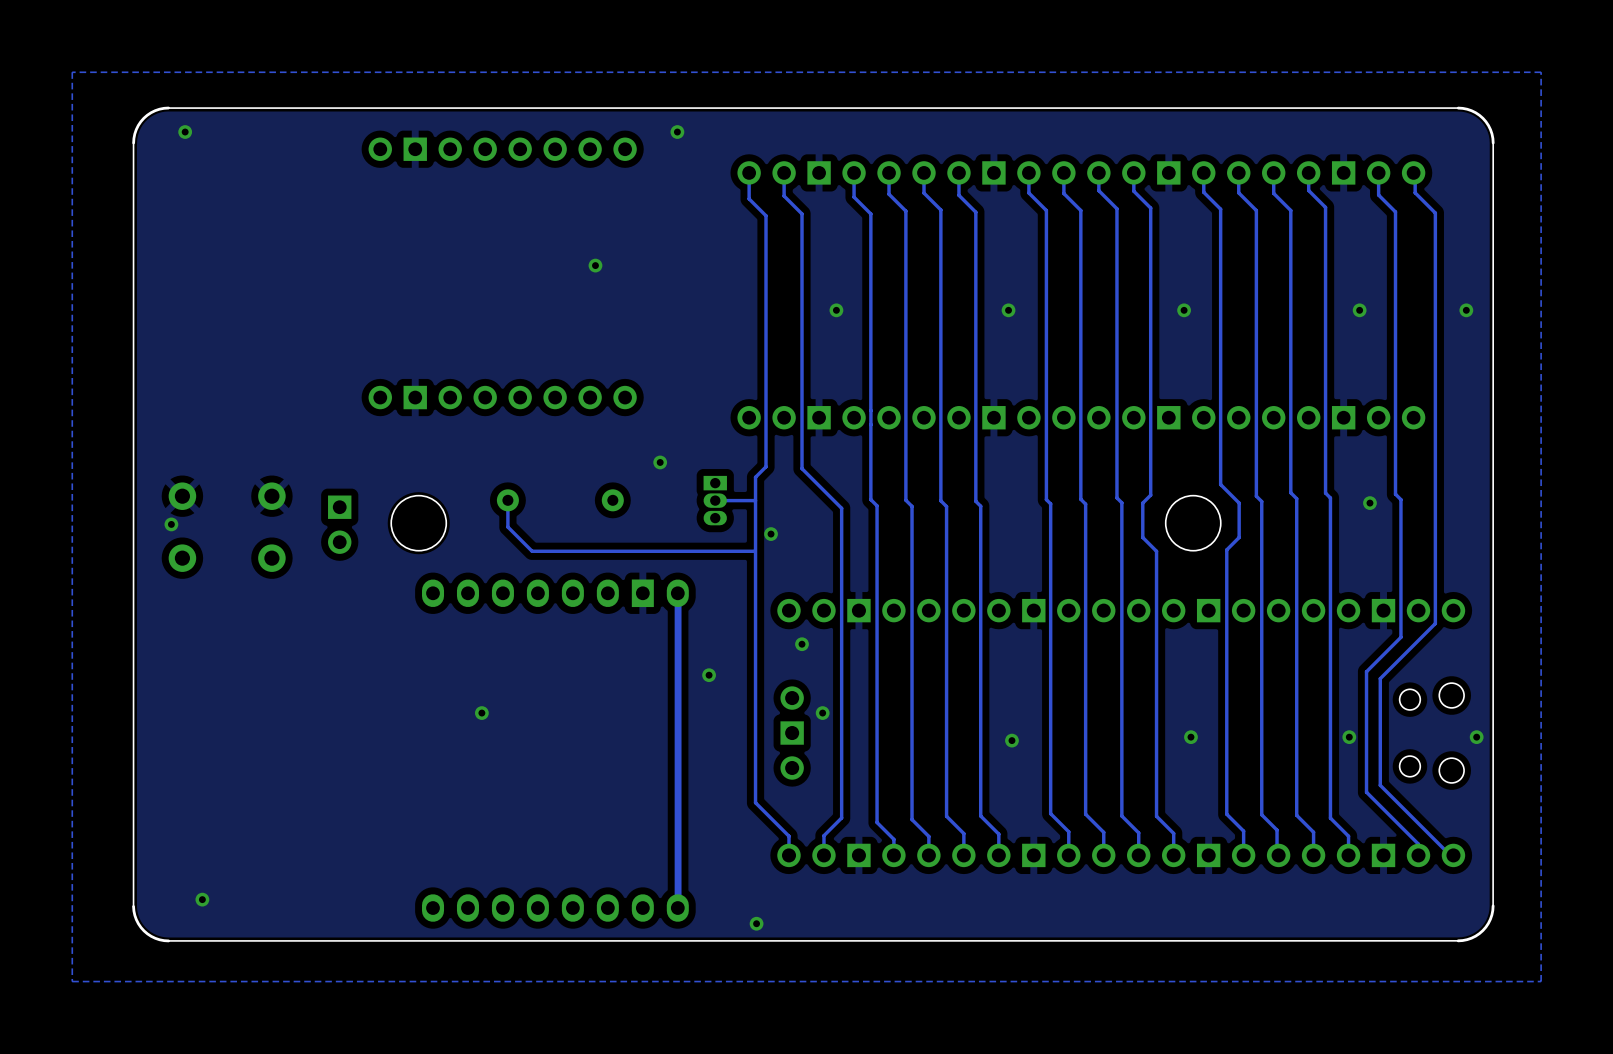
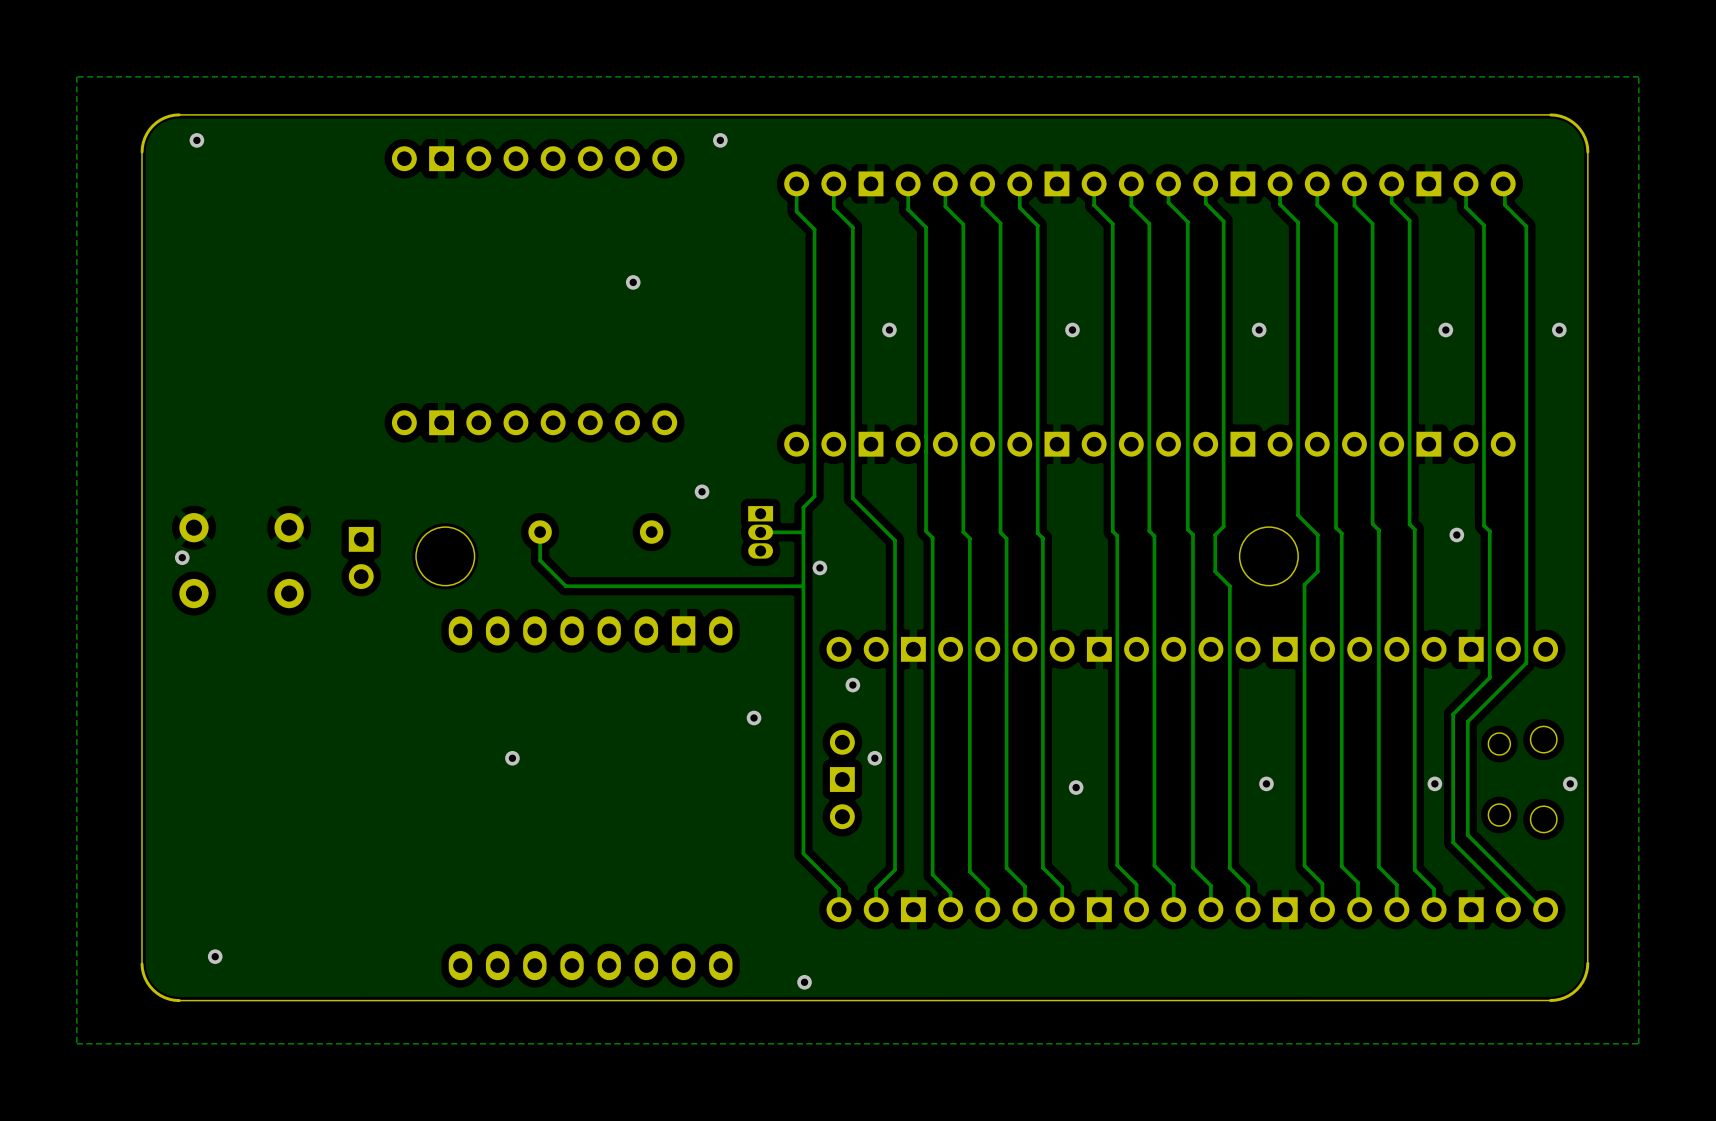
track: (678, 592) (678, 909) -> none

